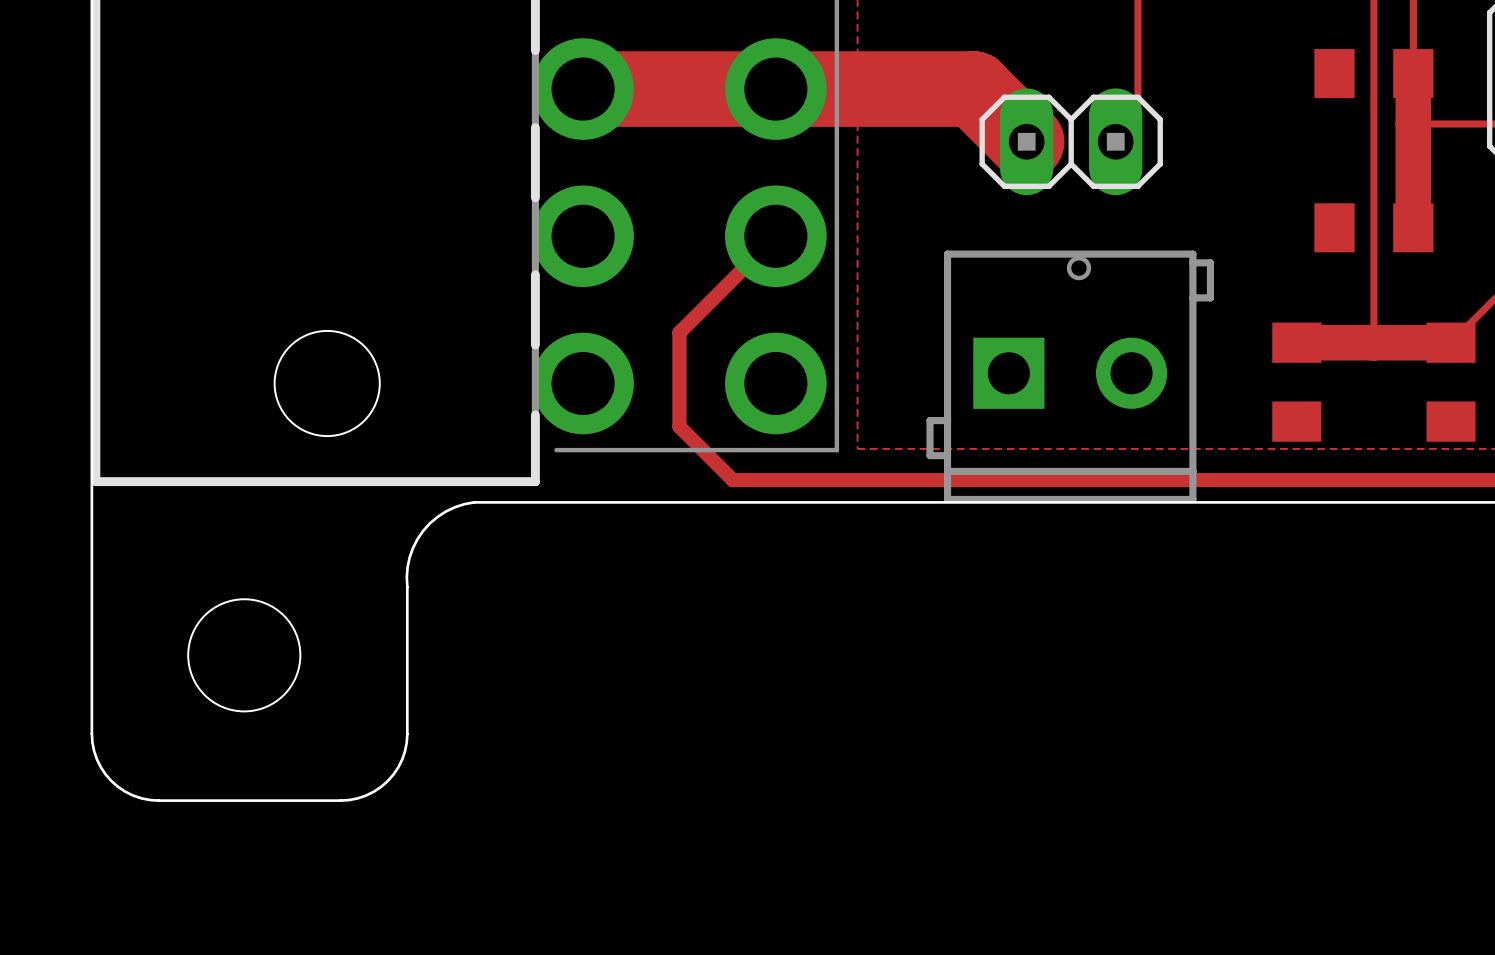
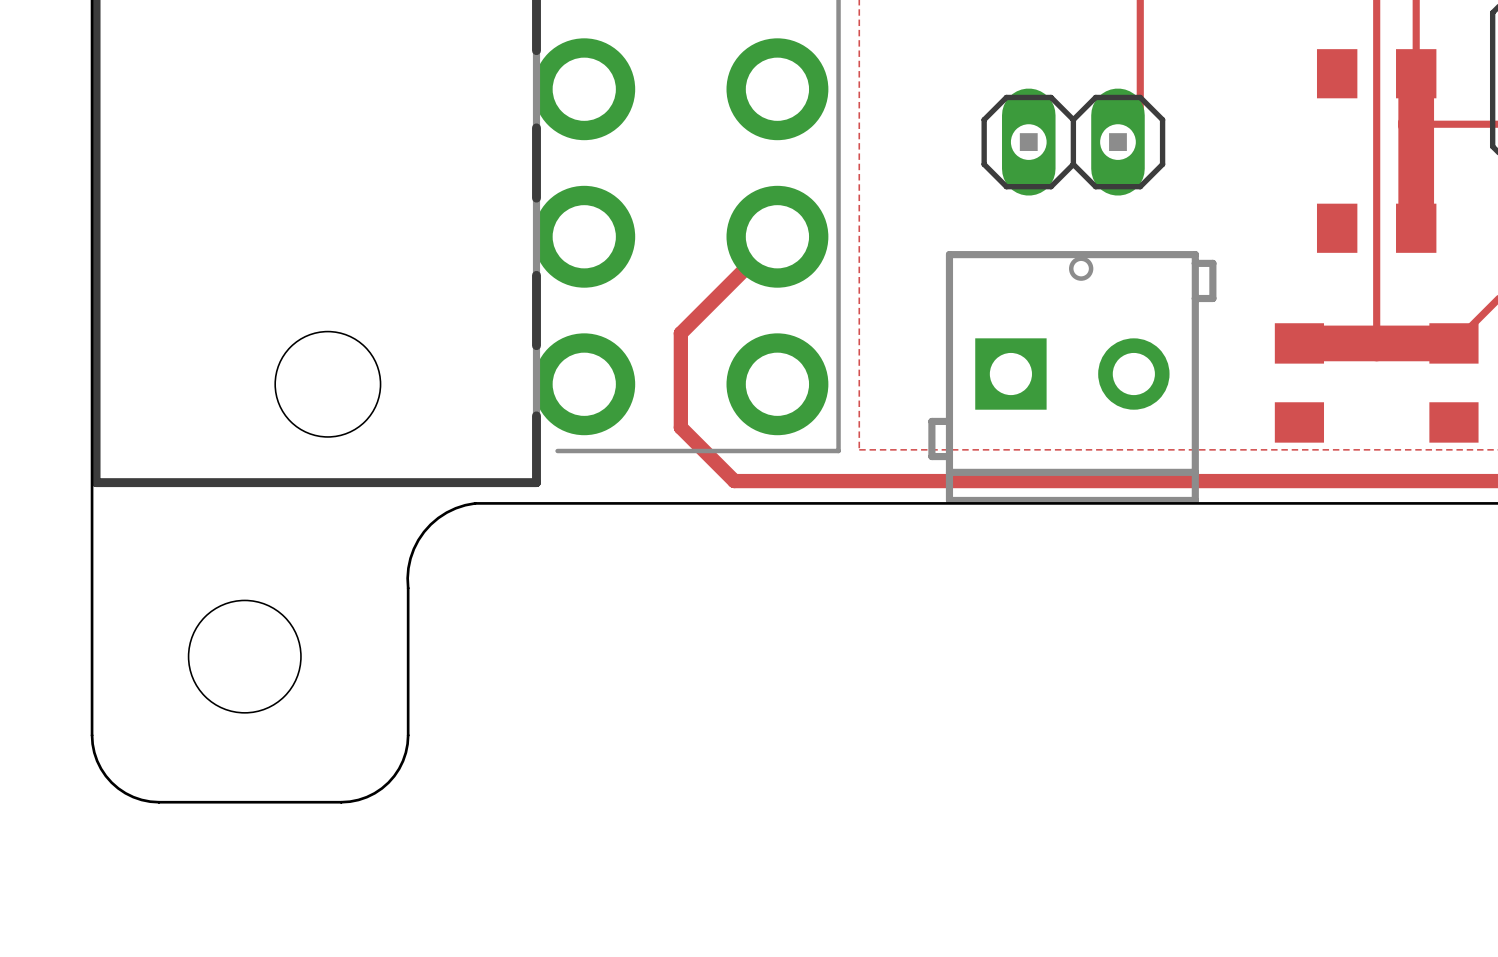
track: (583, 89) (973, 89) (1026, 141) -> none

